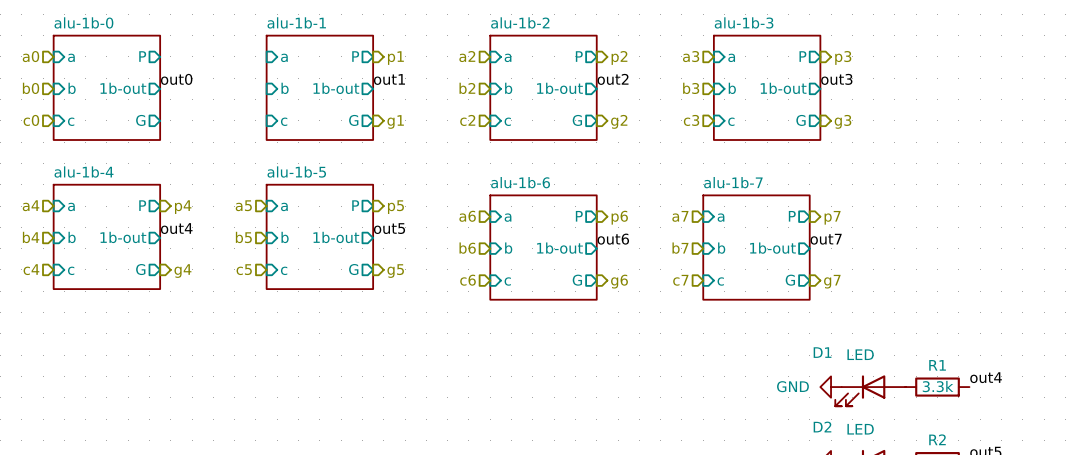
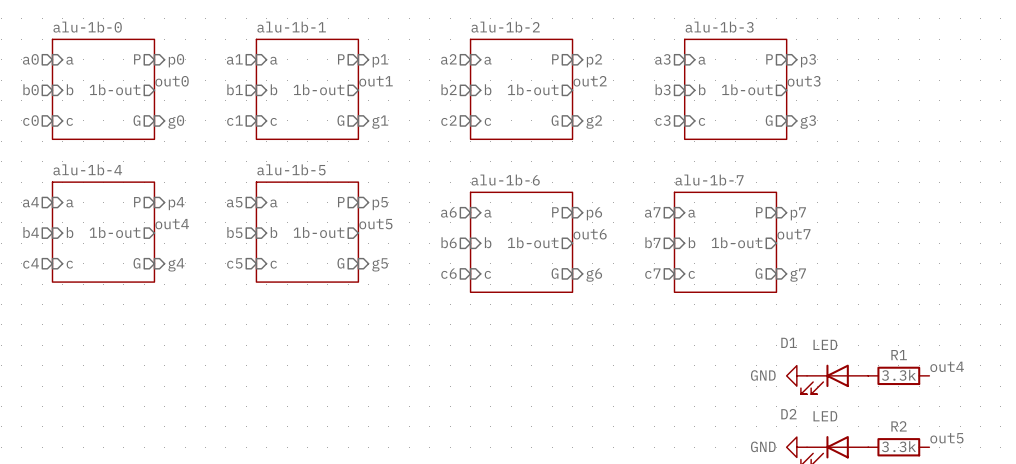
hierarchical label: none -> a1 (234, 59)
hierarchical label: none -> p0 (176, 60)
hierarchical label: none -> b1 (235, 89)
hierarchical label: none -> c1 (234, 120)
hierarchical label: none -> g0 (176, 122)

